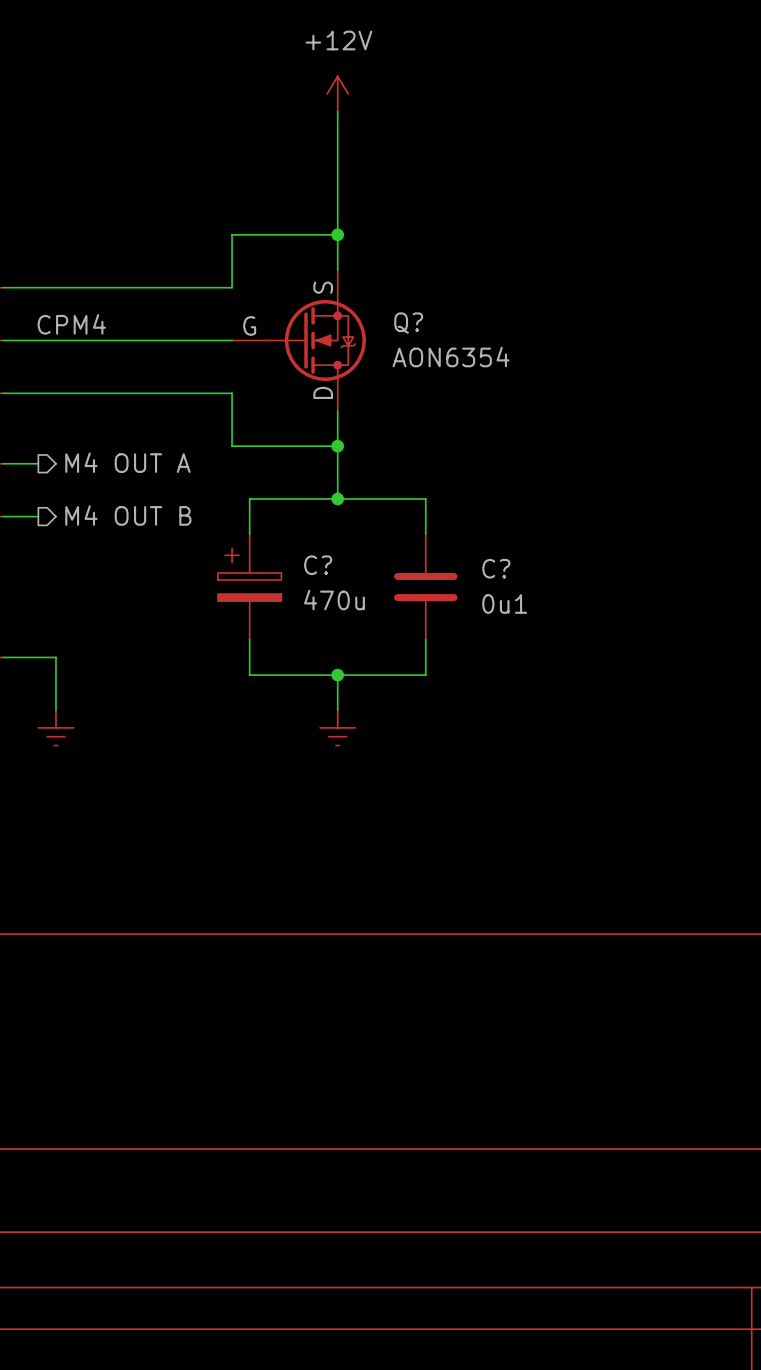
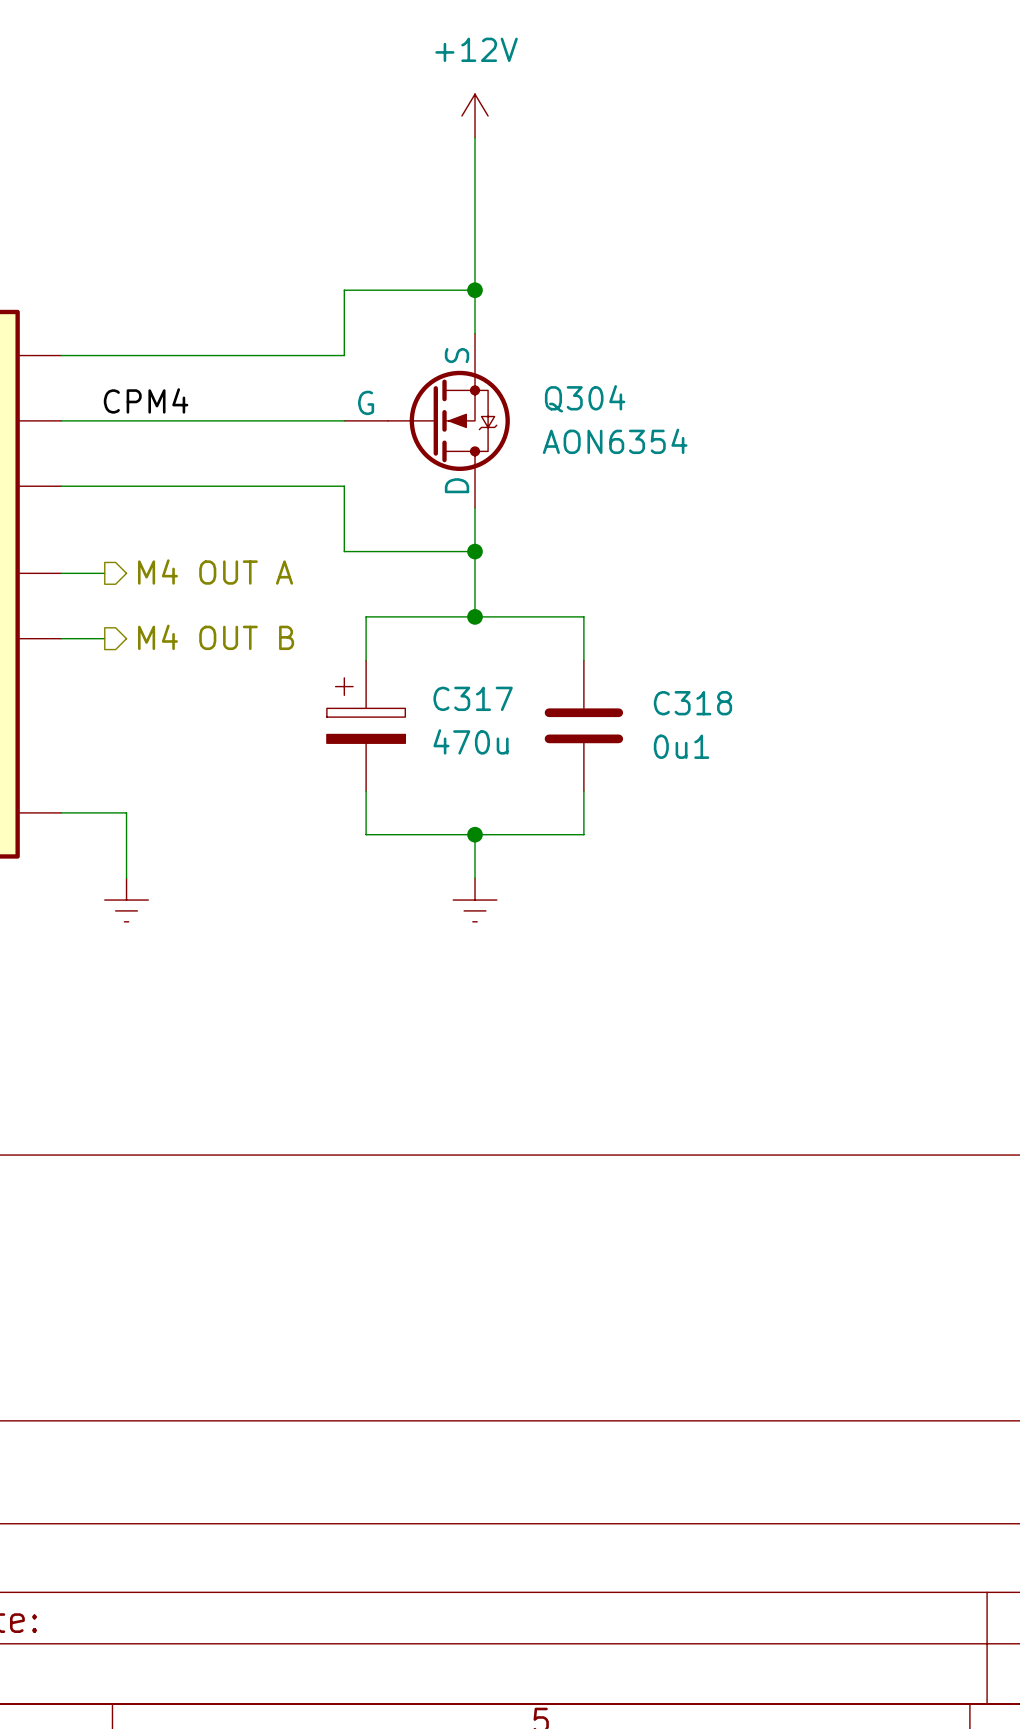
Q? name: Q? (408, 323) -> Q304 (585, 398)
C? name: C? (318, 565) -> C317 (473, 698)
C? name: C? (496, 568) -> C318 (692, 703)

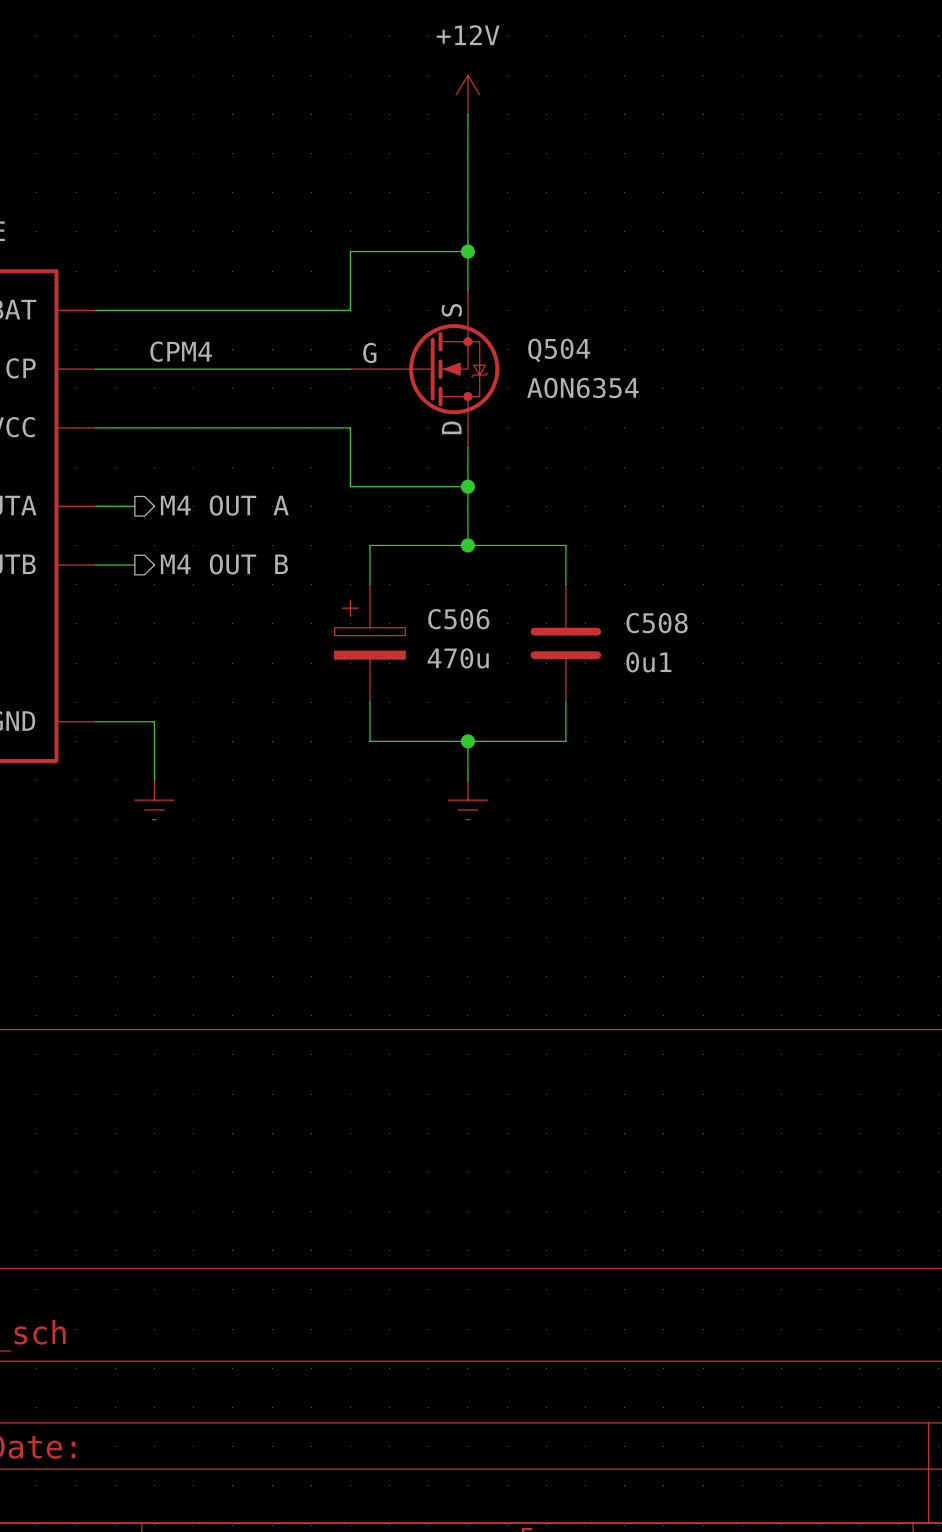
Q304 name: Q304 (585, 398) -> Q504 (559, 350)
C317 name: C317 (473, 698) -> C506 (458, 619)
C318 name: C318 (692, 703) -> C508 (657, 623)

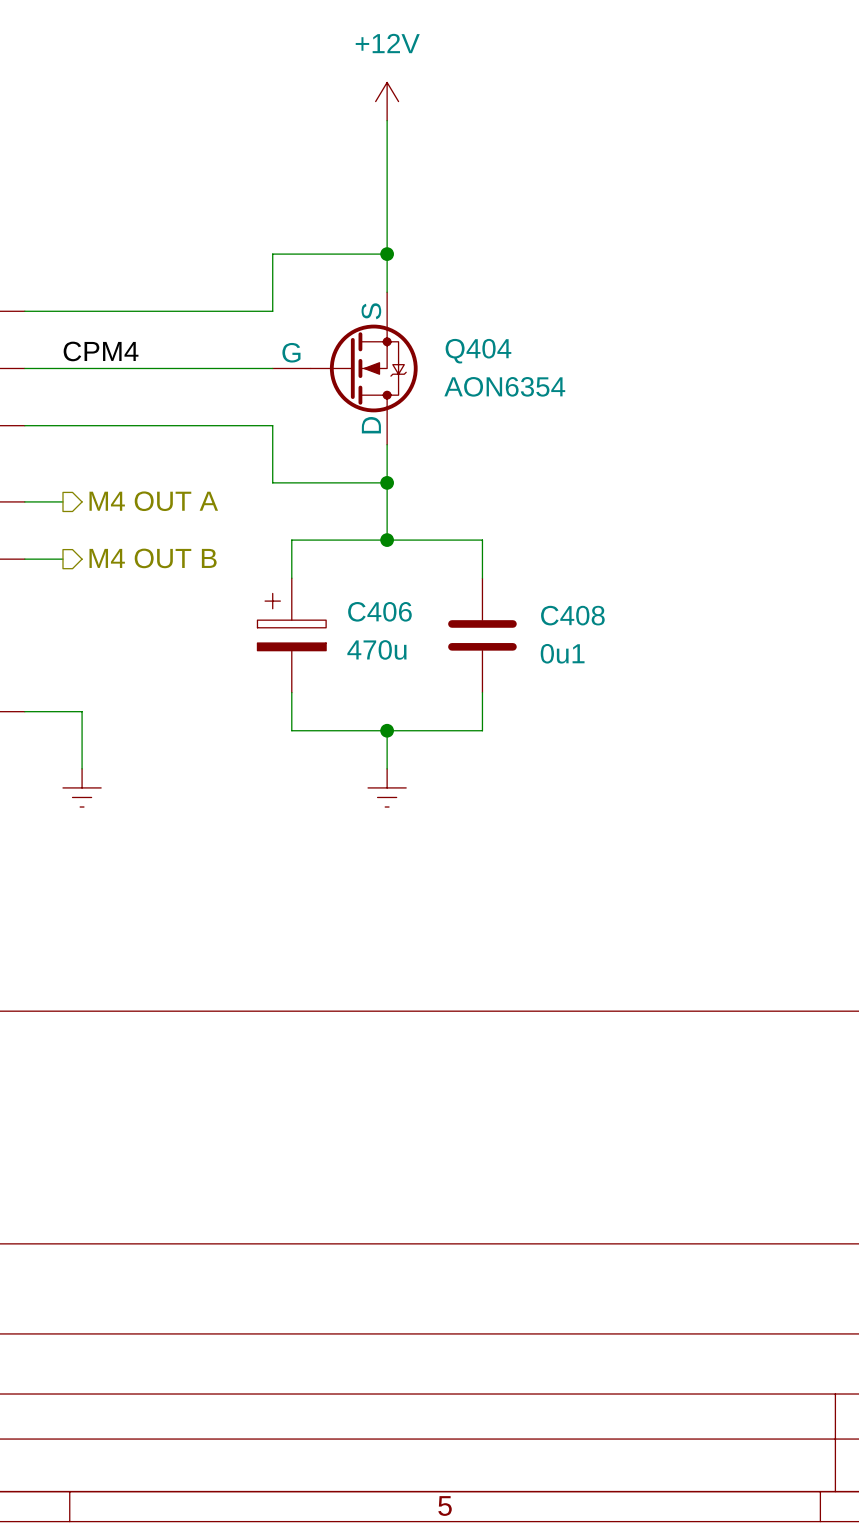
Q504 name: Q504 (559, 350) -> Q404 (478, 351)
C506 name: C506 (458, 619) -> C406 (379, 611)
C508 name: C508 (657, 623) -> C408 (572, 615)

